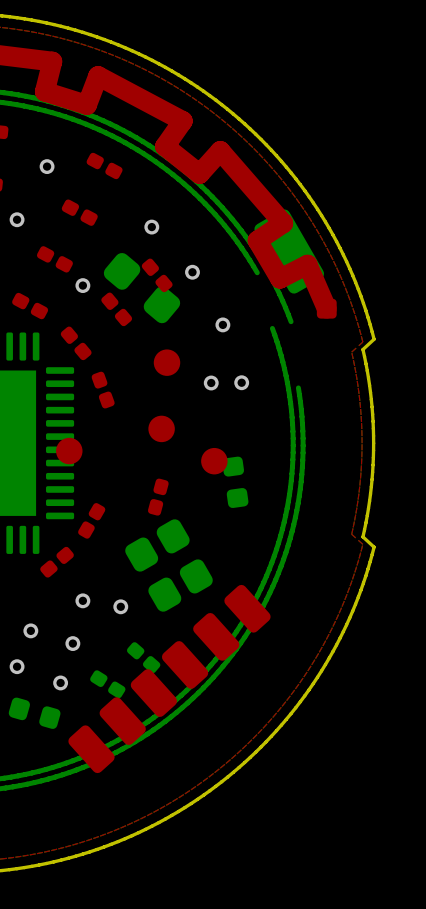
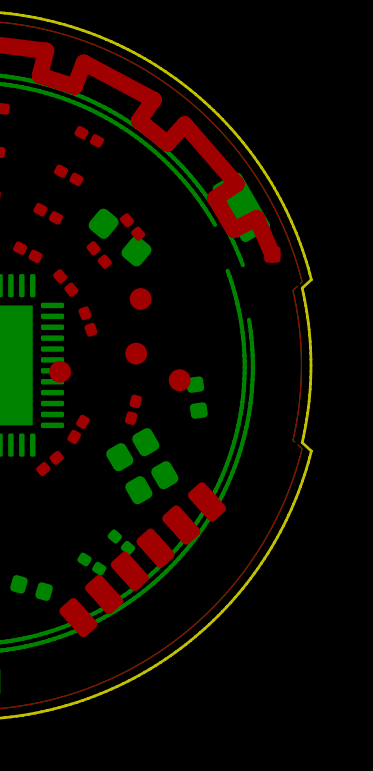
via: (47, 166) -> none
via: (17, 219) -> none
via: (151, 227) -> none
via: (192, 272) -> none
via: (82, 285) -> none
via: (222, 324) -> none
via: (211, 382) -> none
via: (241, 382) -> none
via: (82, 600) -> none
via: (120, 606) -> none
via: (30, 630) -> none
via: (72, 643) -> none
via: (17, 666) -> none
via: (60, 682) -> none

